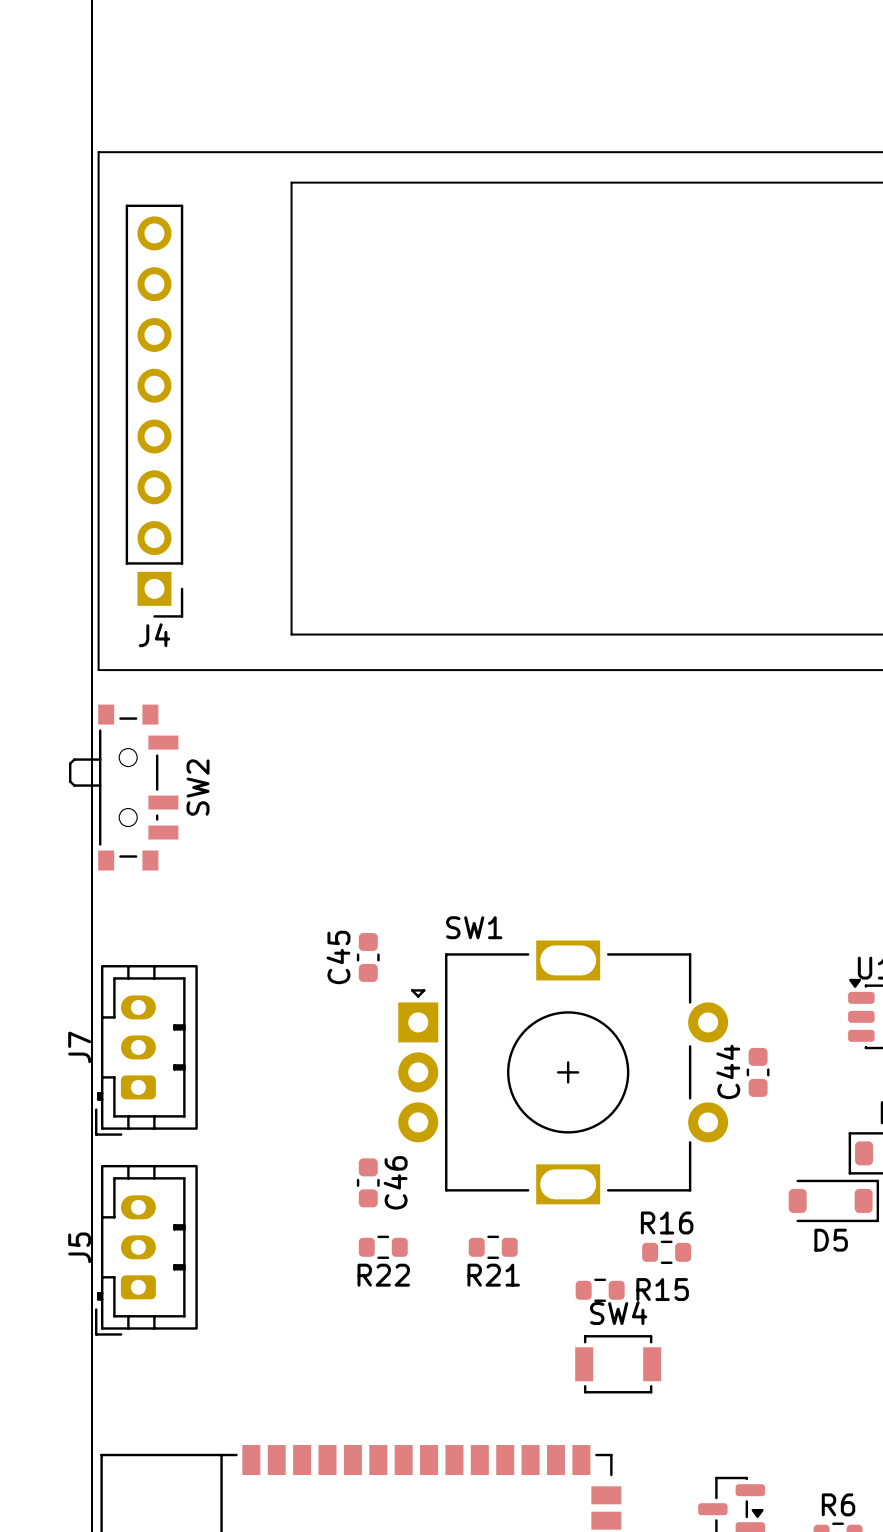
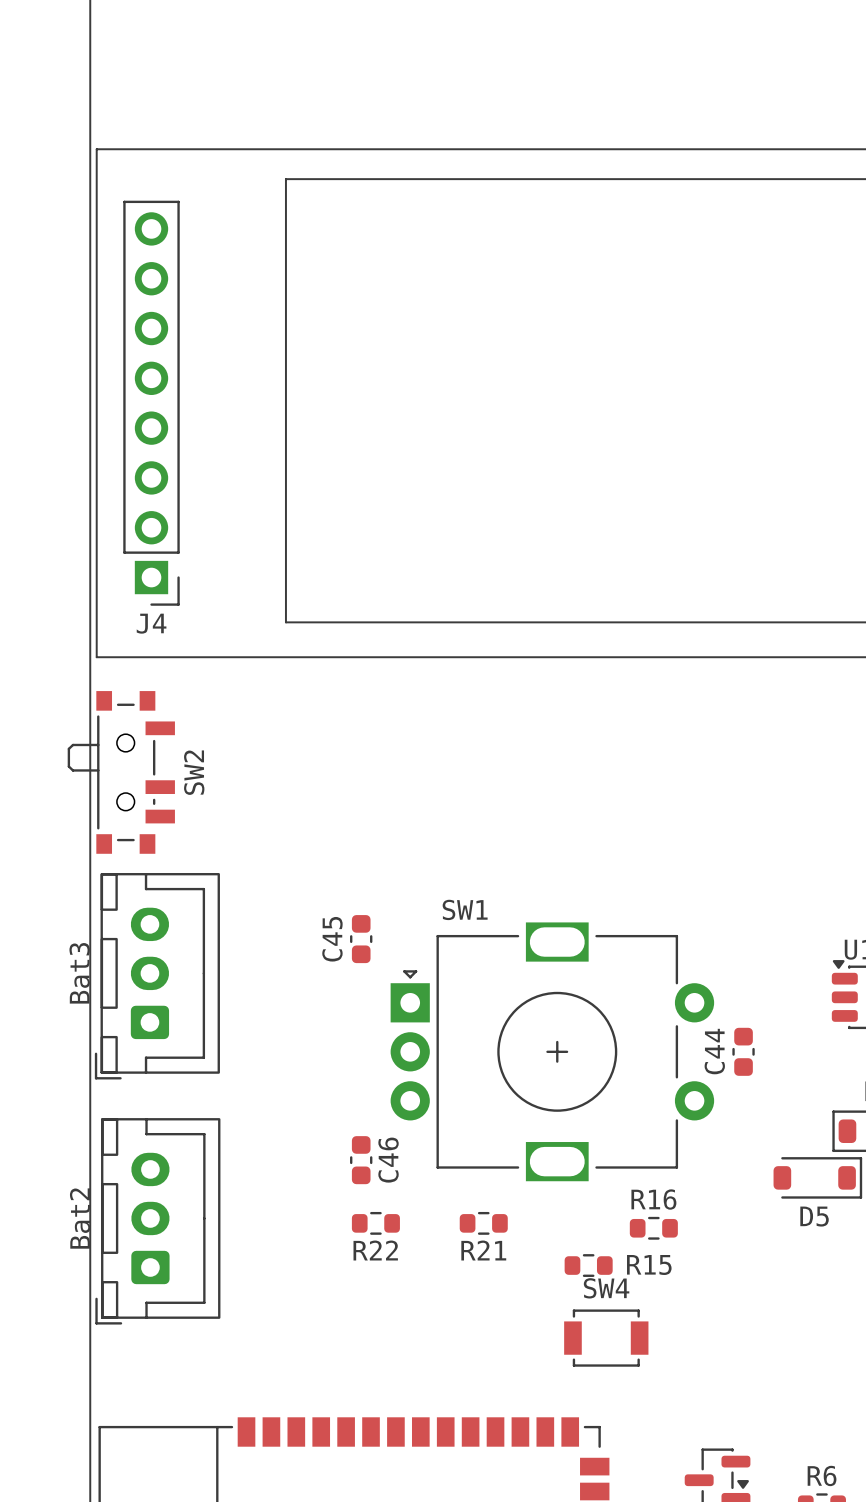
Bat3: none -> (157, 976)
J7: (146, 1050) -> none
Bat2: none -> (157, 1221)
J5: (146, 1250) -> none

